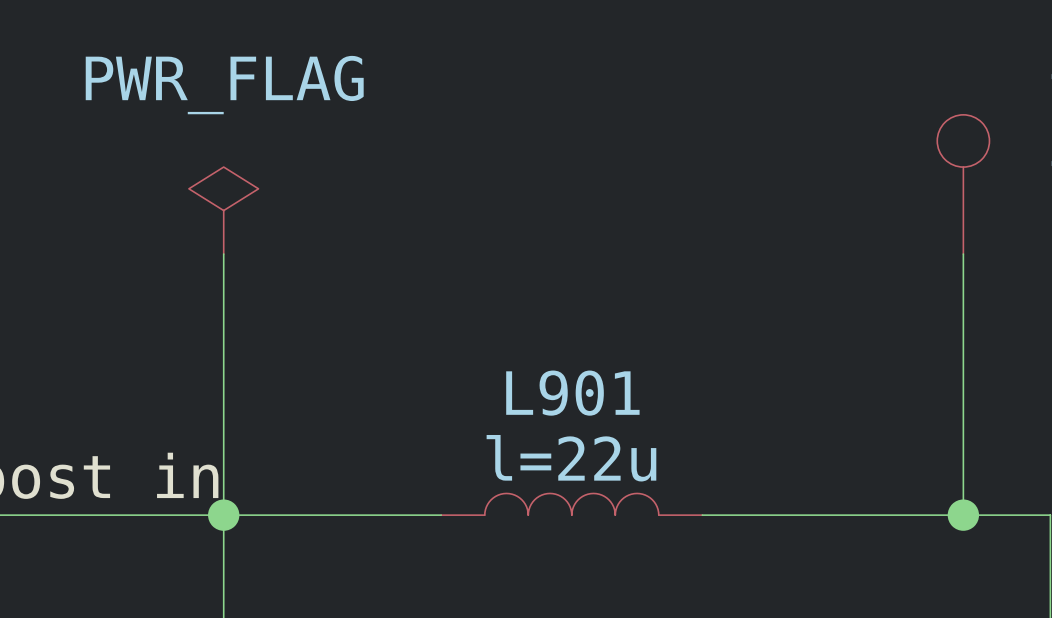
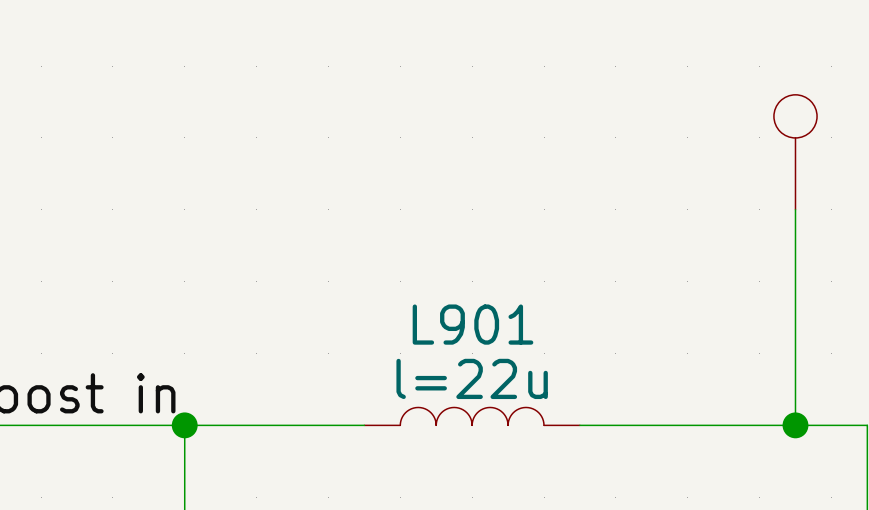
power symbol: PWR_FLAG (223, 210) -> none
wire: (223, 254) (223, 515) -> none

